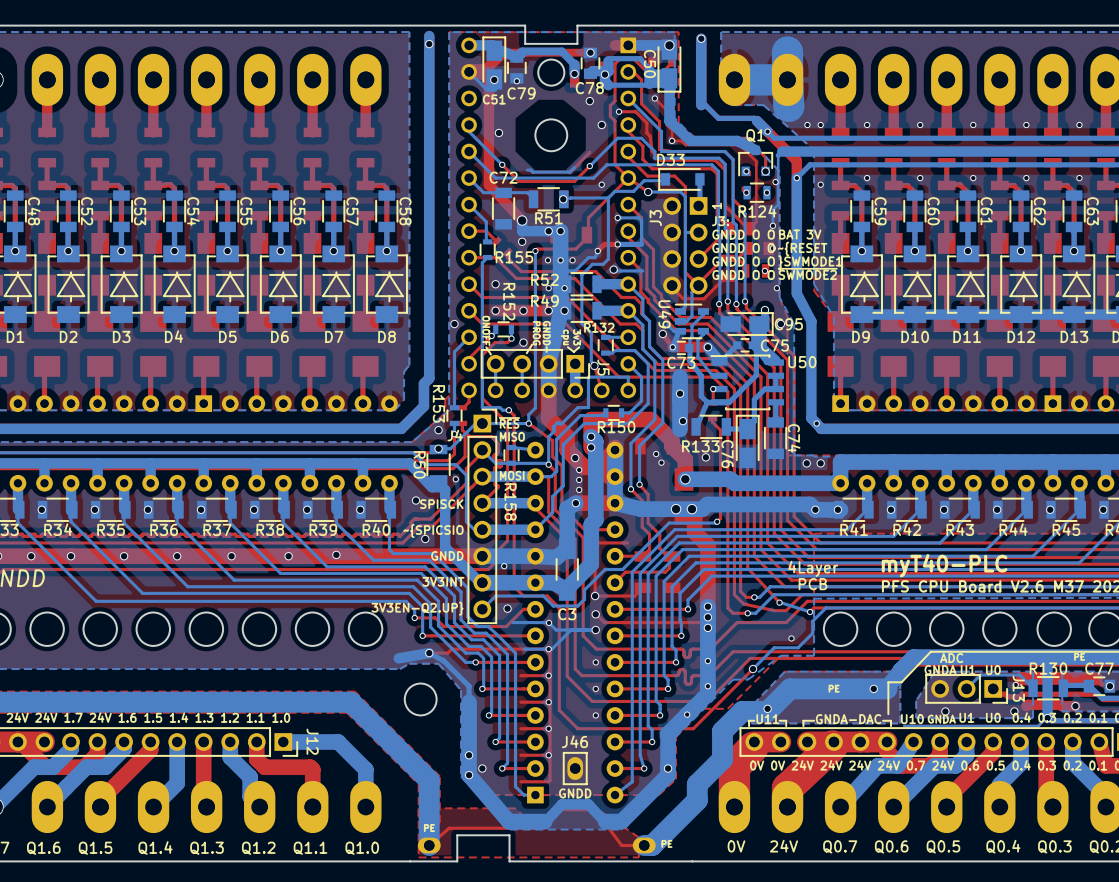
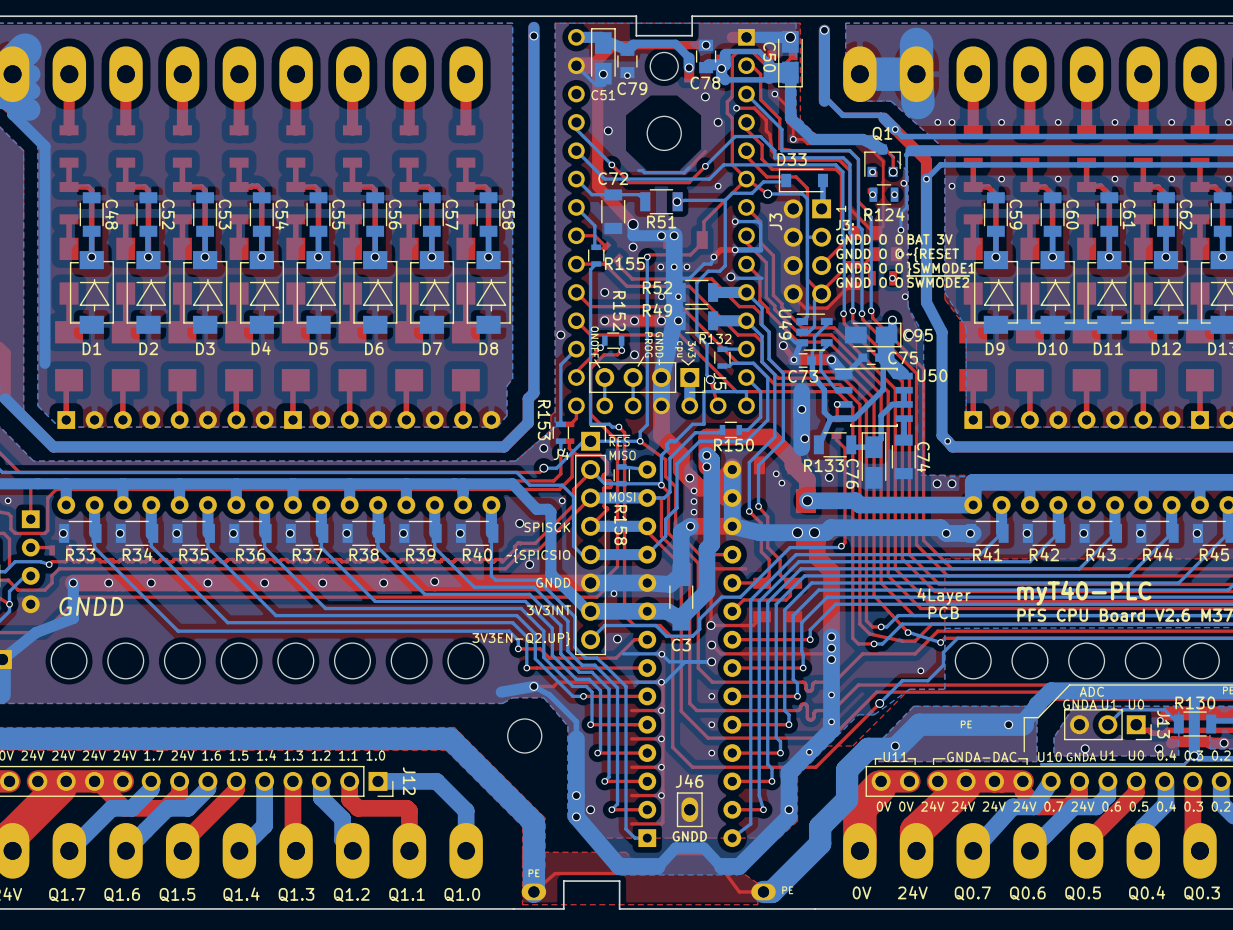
R50: (438, 464) -> none

